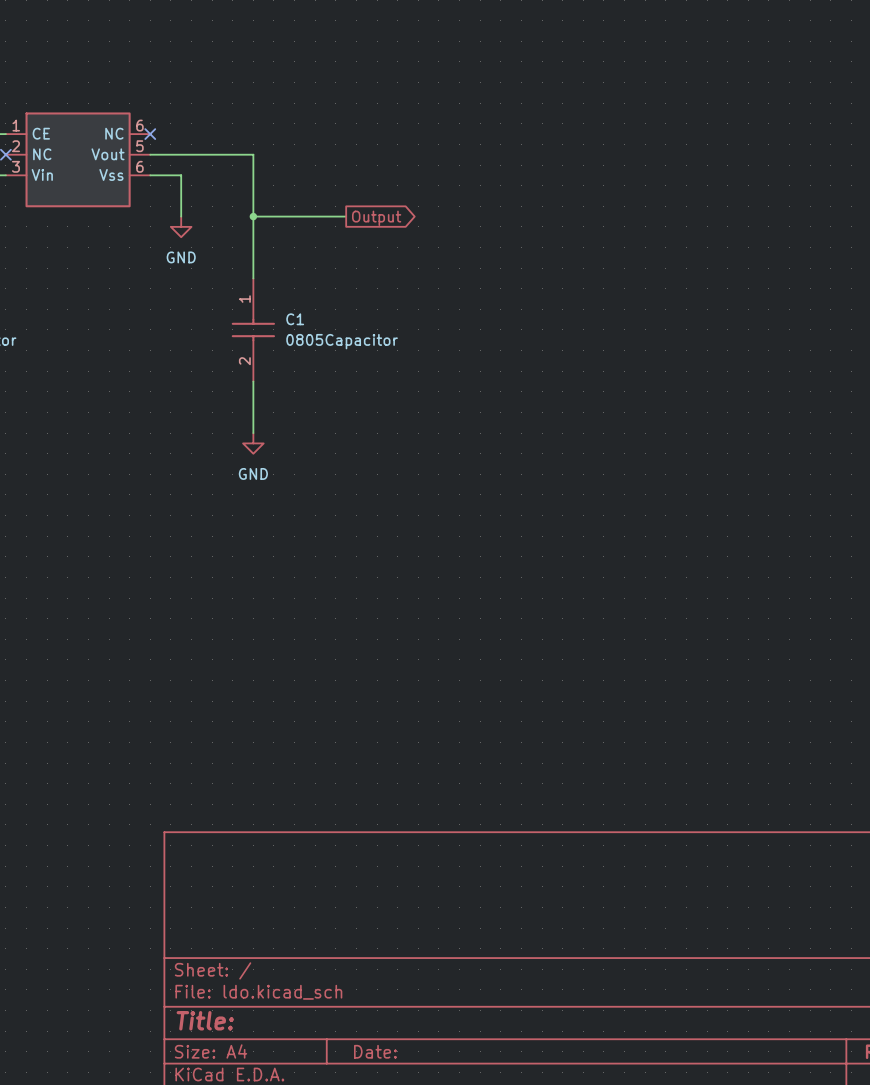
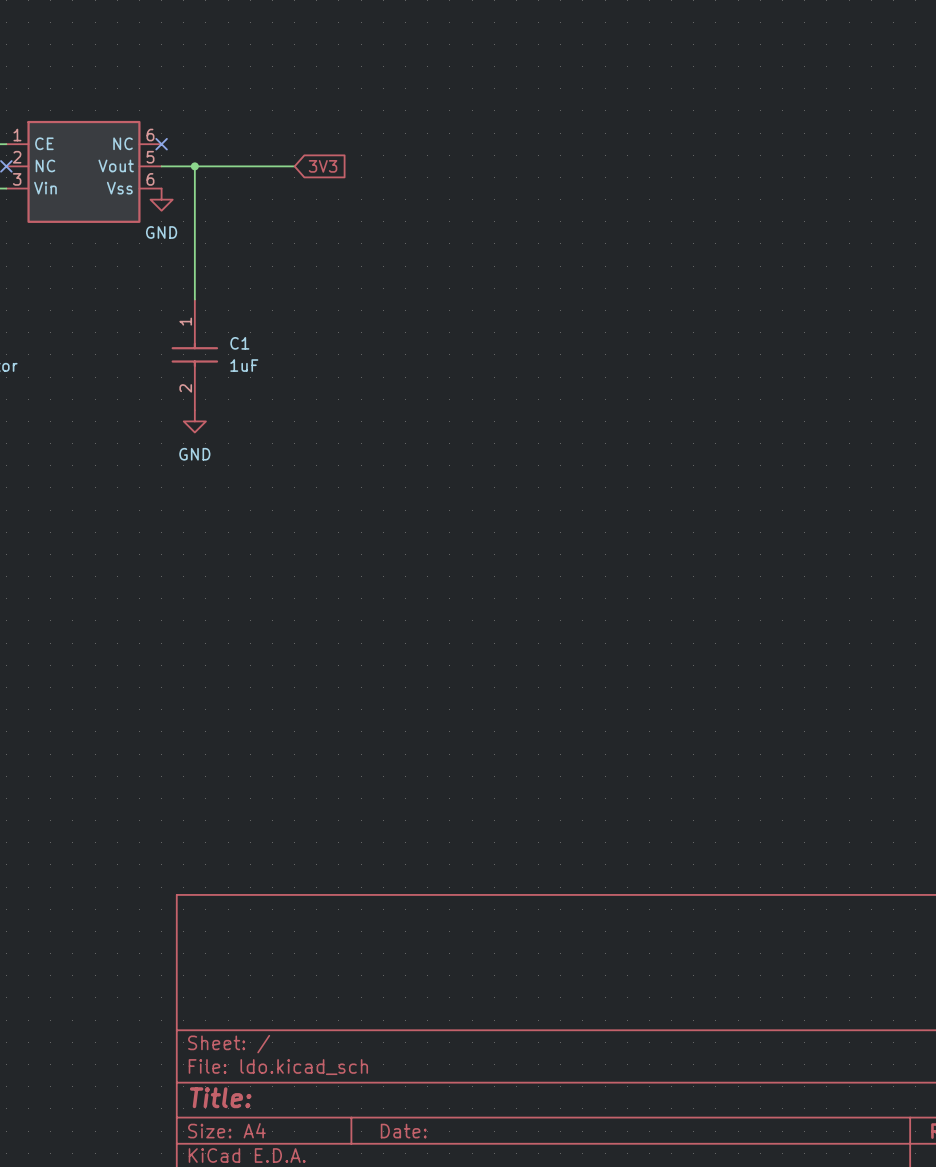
junction: none -> (194, 166)
wire: (253, 154) (253, 278) -> (272, 166) (294, 166)
global label: none -> 3V3 (323, 166)
wire: (150, 175) (181, 175) -> (194, 166) (194, 188)
wire: none -> (194, 232) (194, 299)
wire: (253, 216) (346, 216) -> none
junction: (253, 216) -> none
global label: Output (376, 218) -> none
power symbol position: GND (181, 226) -> GND (161, 199)
C1 position: (253, 329) -> (194, 354)
C1 value: 0805Capacitor (342, 341) -> 1uF (244, 365)
wire: (253, 381) (253, 433) -> none
power symbol: none -> GND (194, 421)
power symbol: GND (253, 443) -> none

